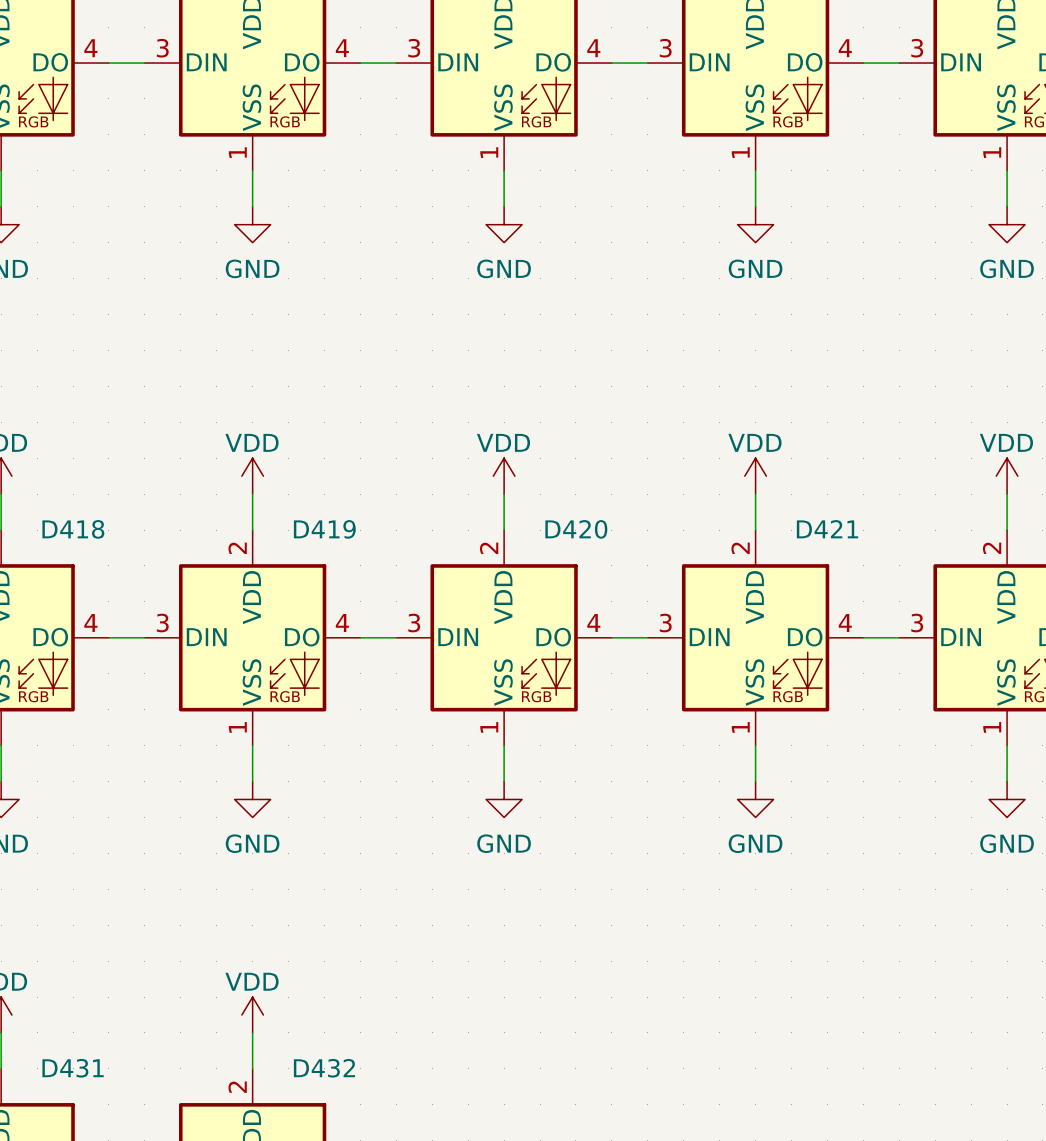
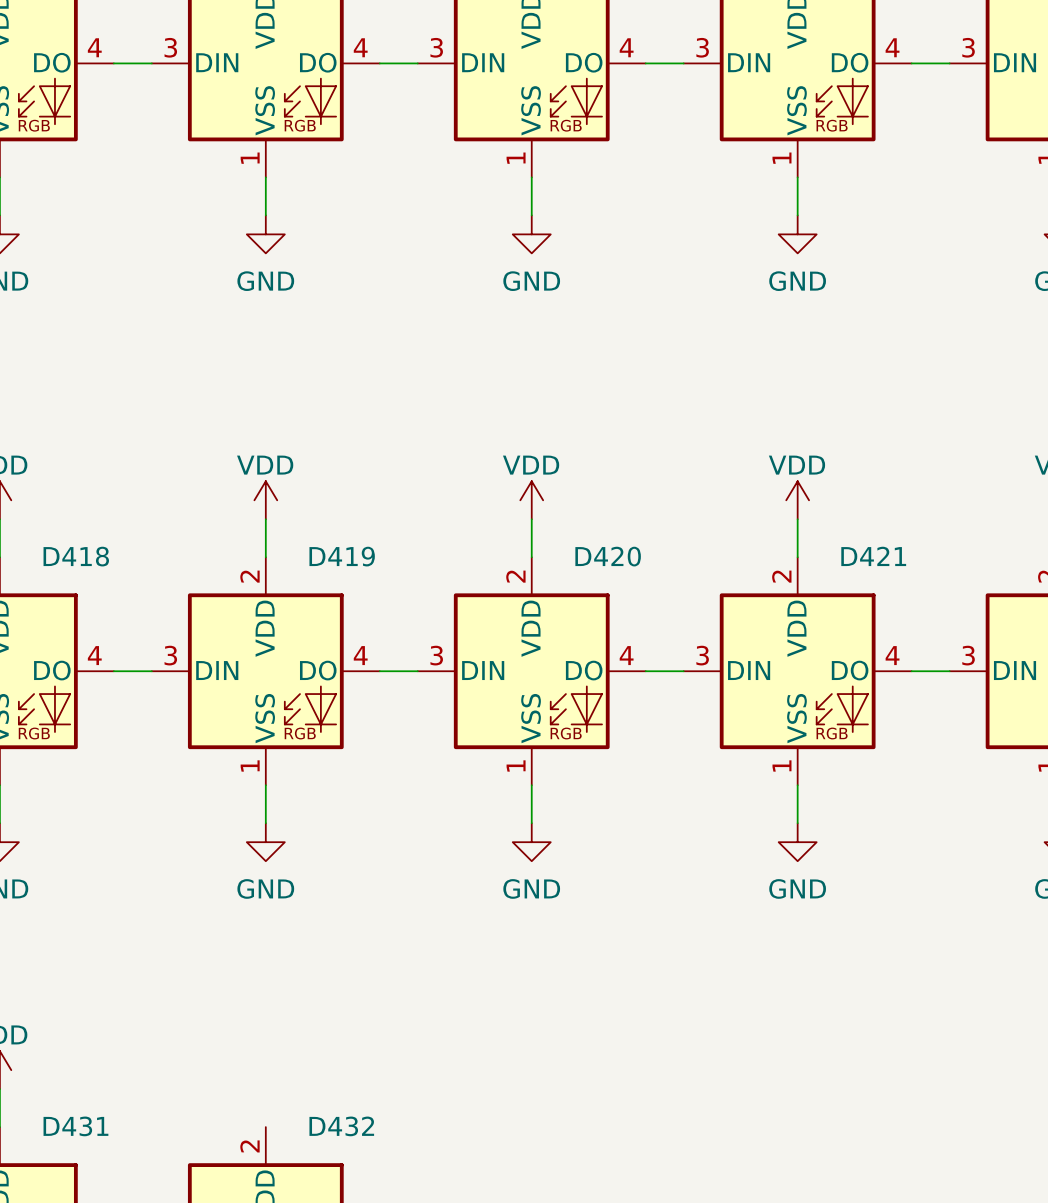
power symbol: VDD (252, 1015) -> none
wire: (252, 1032) (252, 1068) -> none

